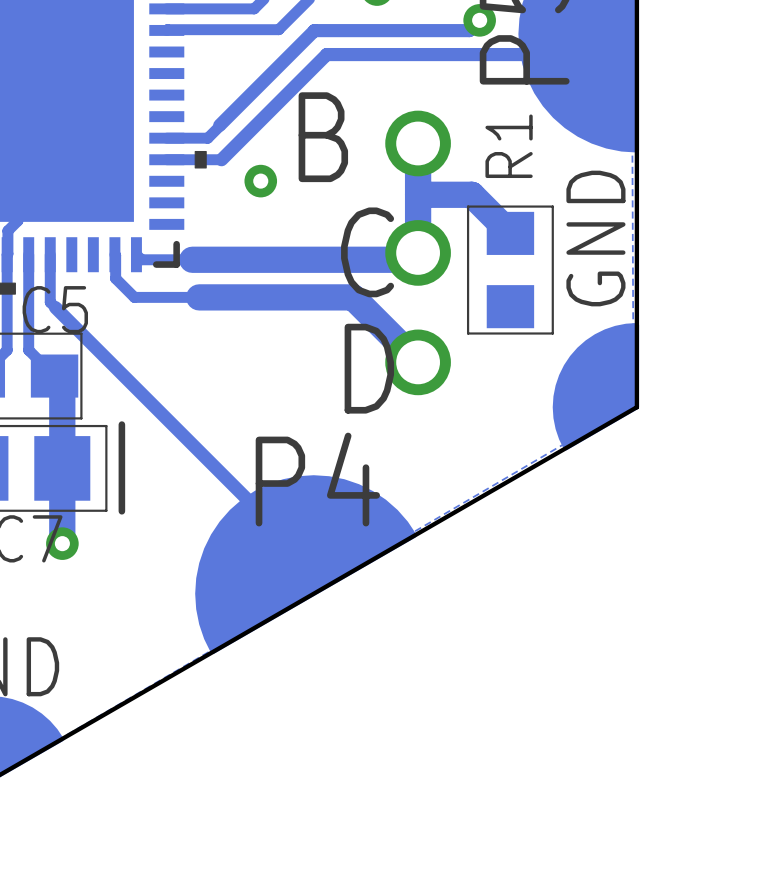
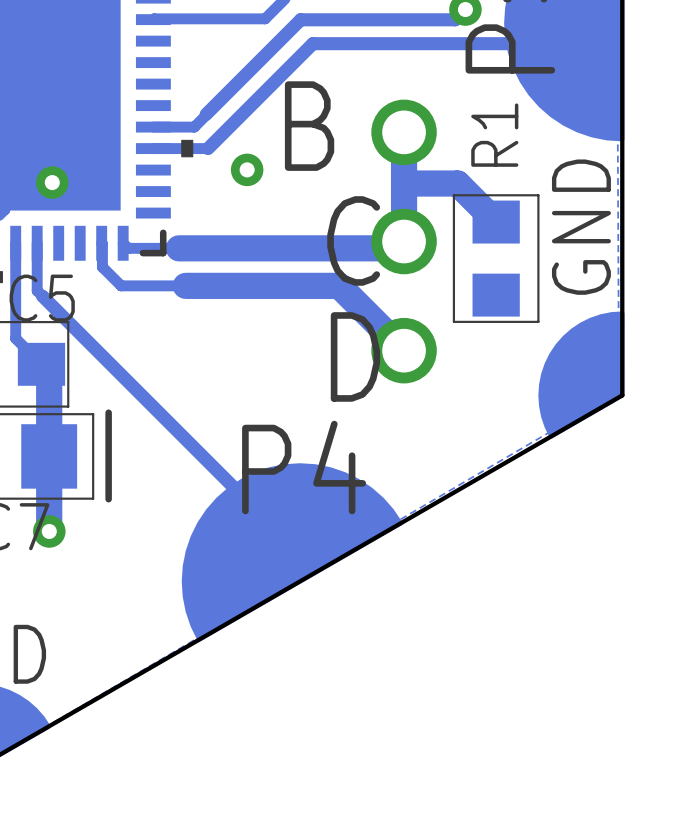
via: none -> (52, 182)

